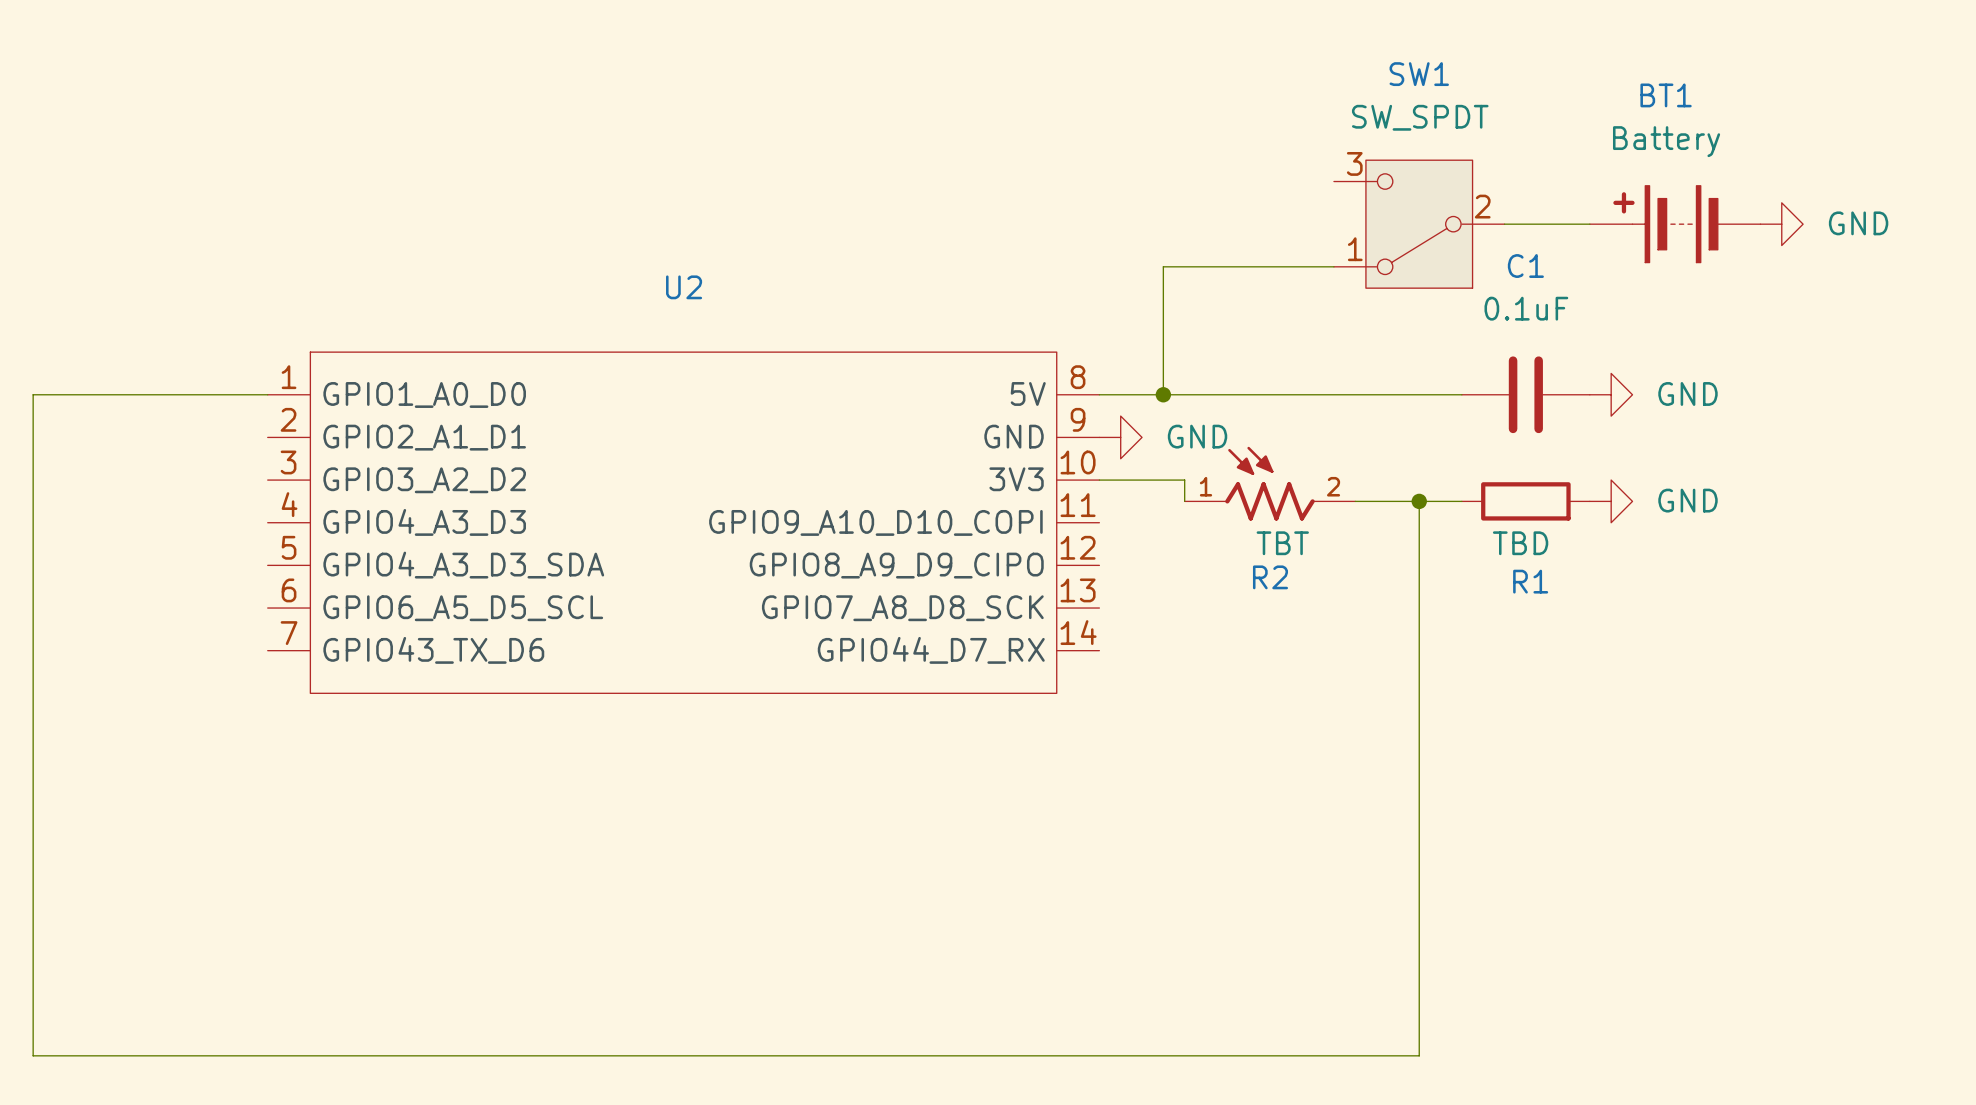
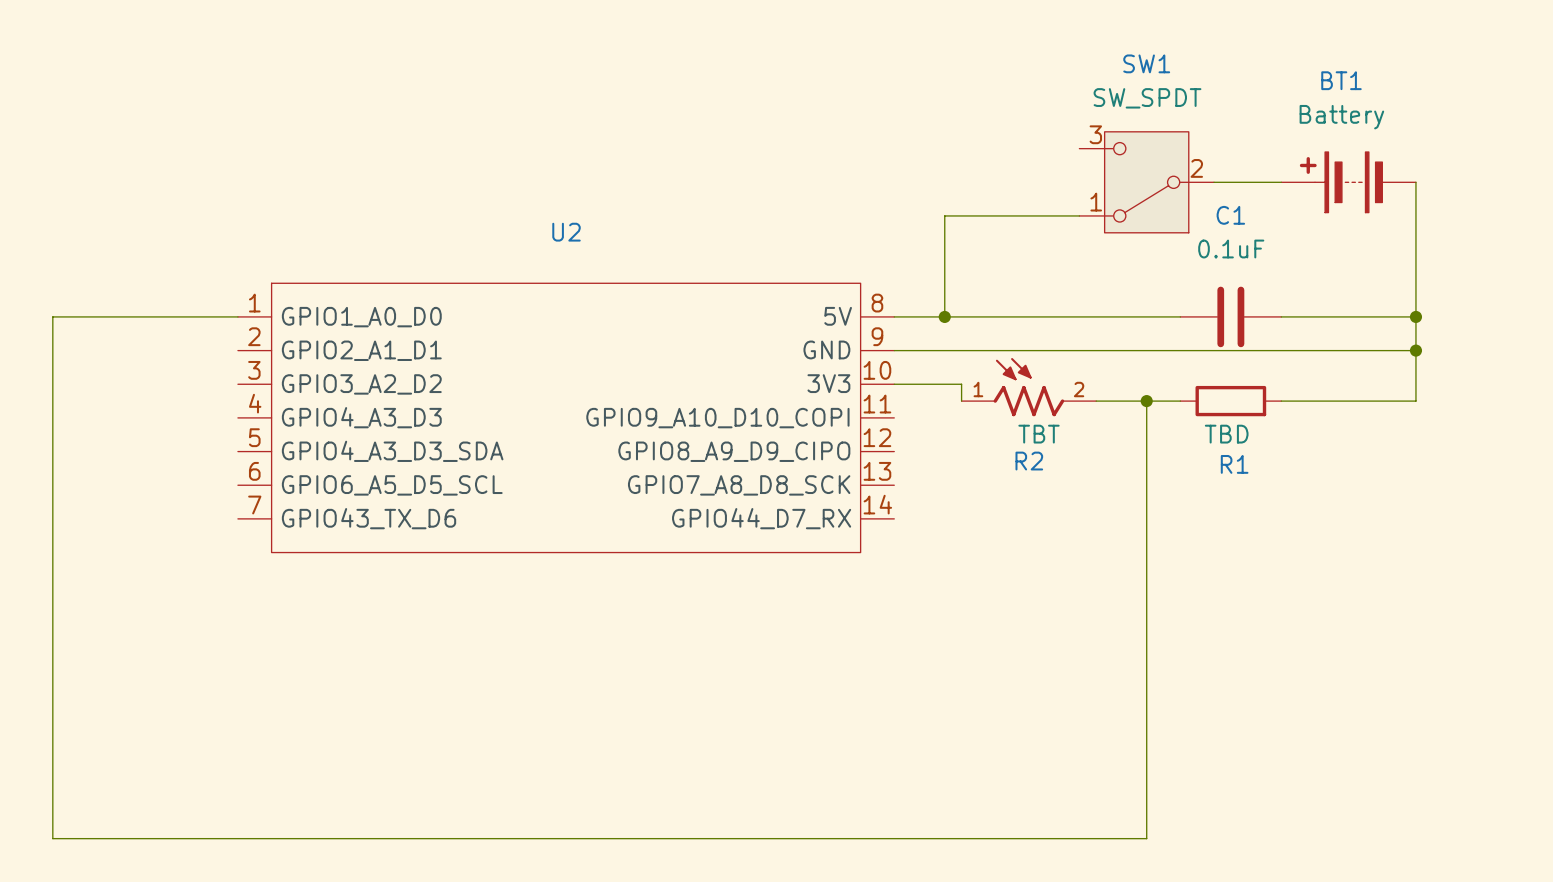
wire: none -> (1415, 182) (1415, 401) (1281, 401)
power symbol: GND (1781, 224) -> none
wire: none -> (1281, 316) (1415, 316)
power symbol: GND (1611, 394) -> none
junction: none -> (1415, 316)
wire: none -> (894, 350) (1415, 350)
power symbol: GND (1120, 437) -> none
junction: none -> (1415, 350)
power symbol: GND (1611, 501) -> none

